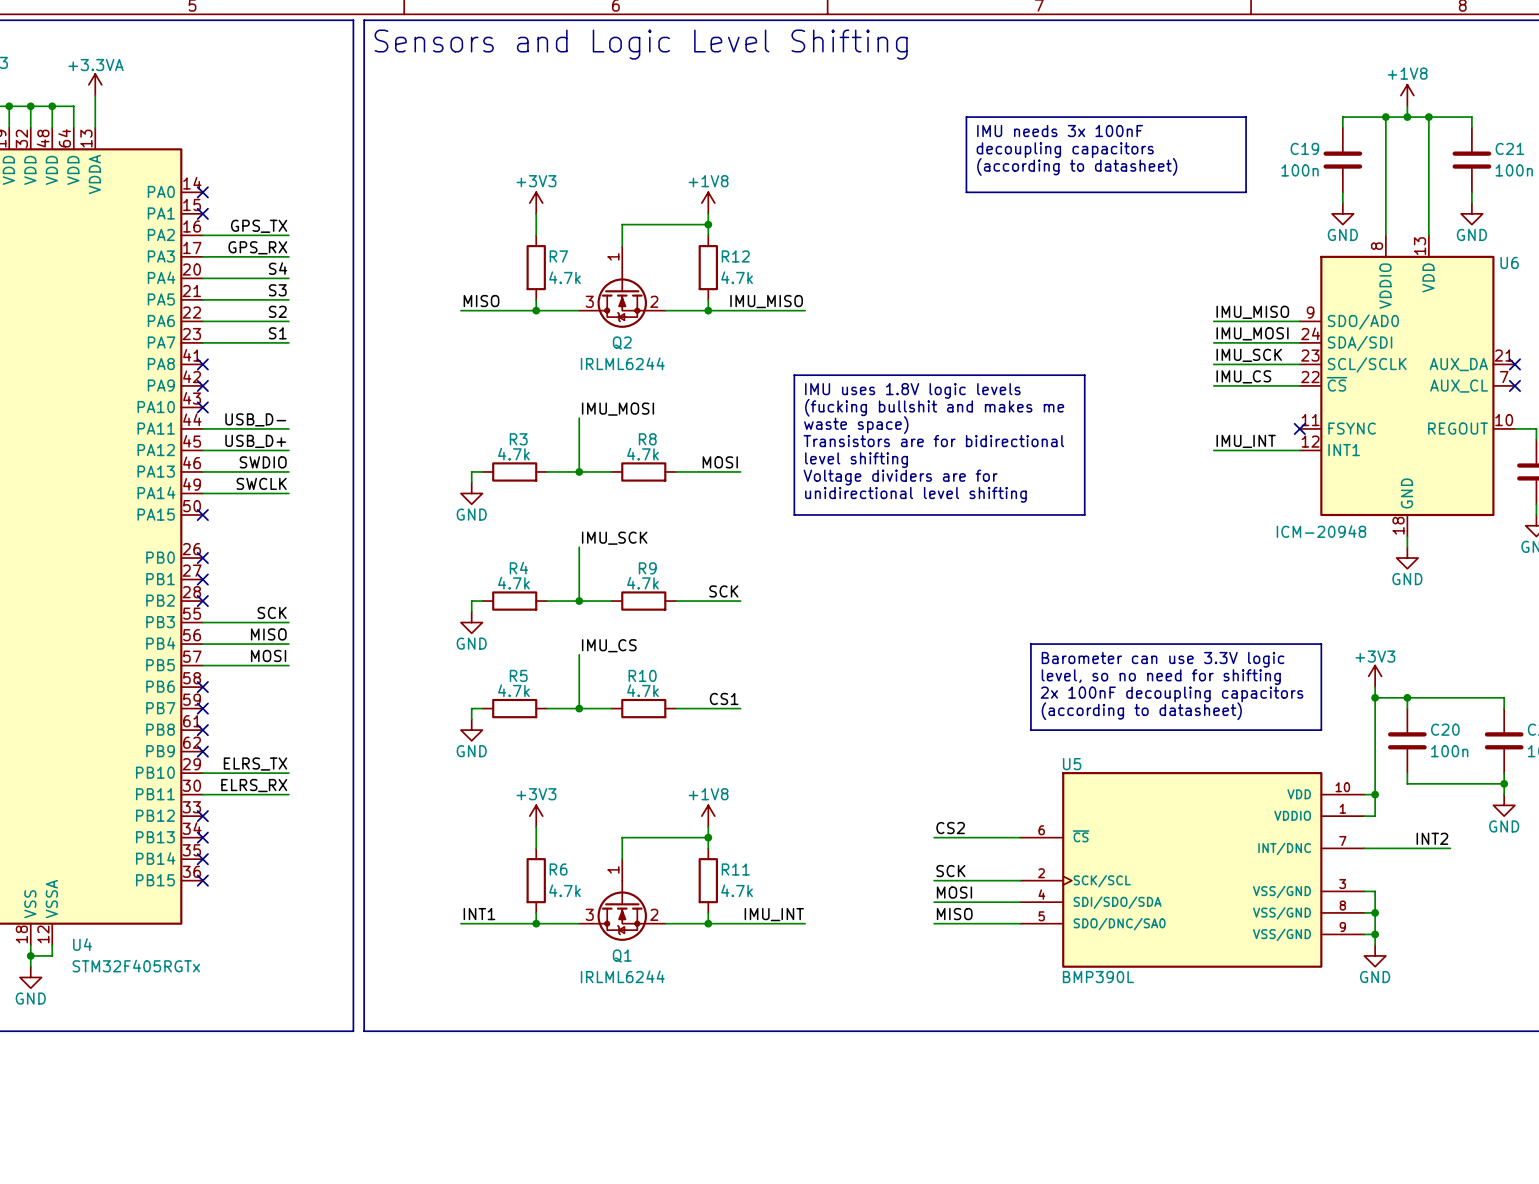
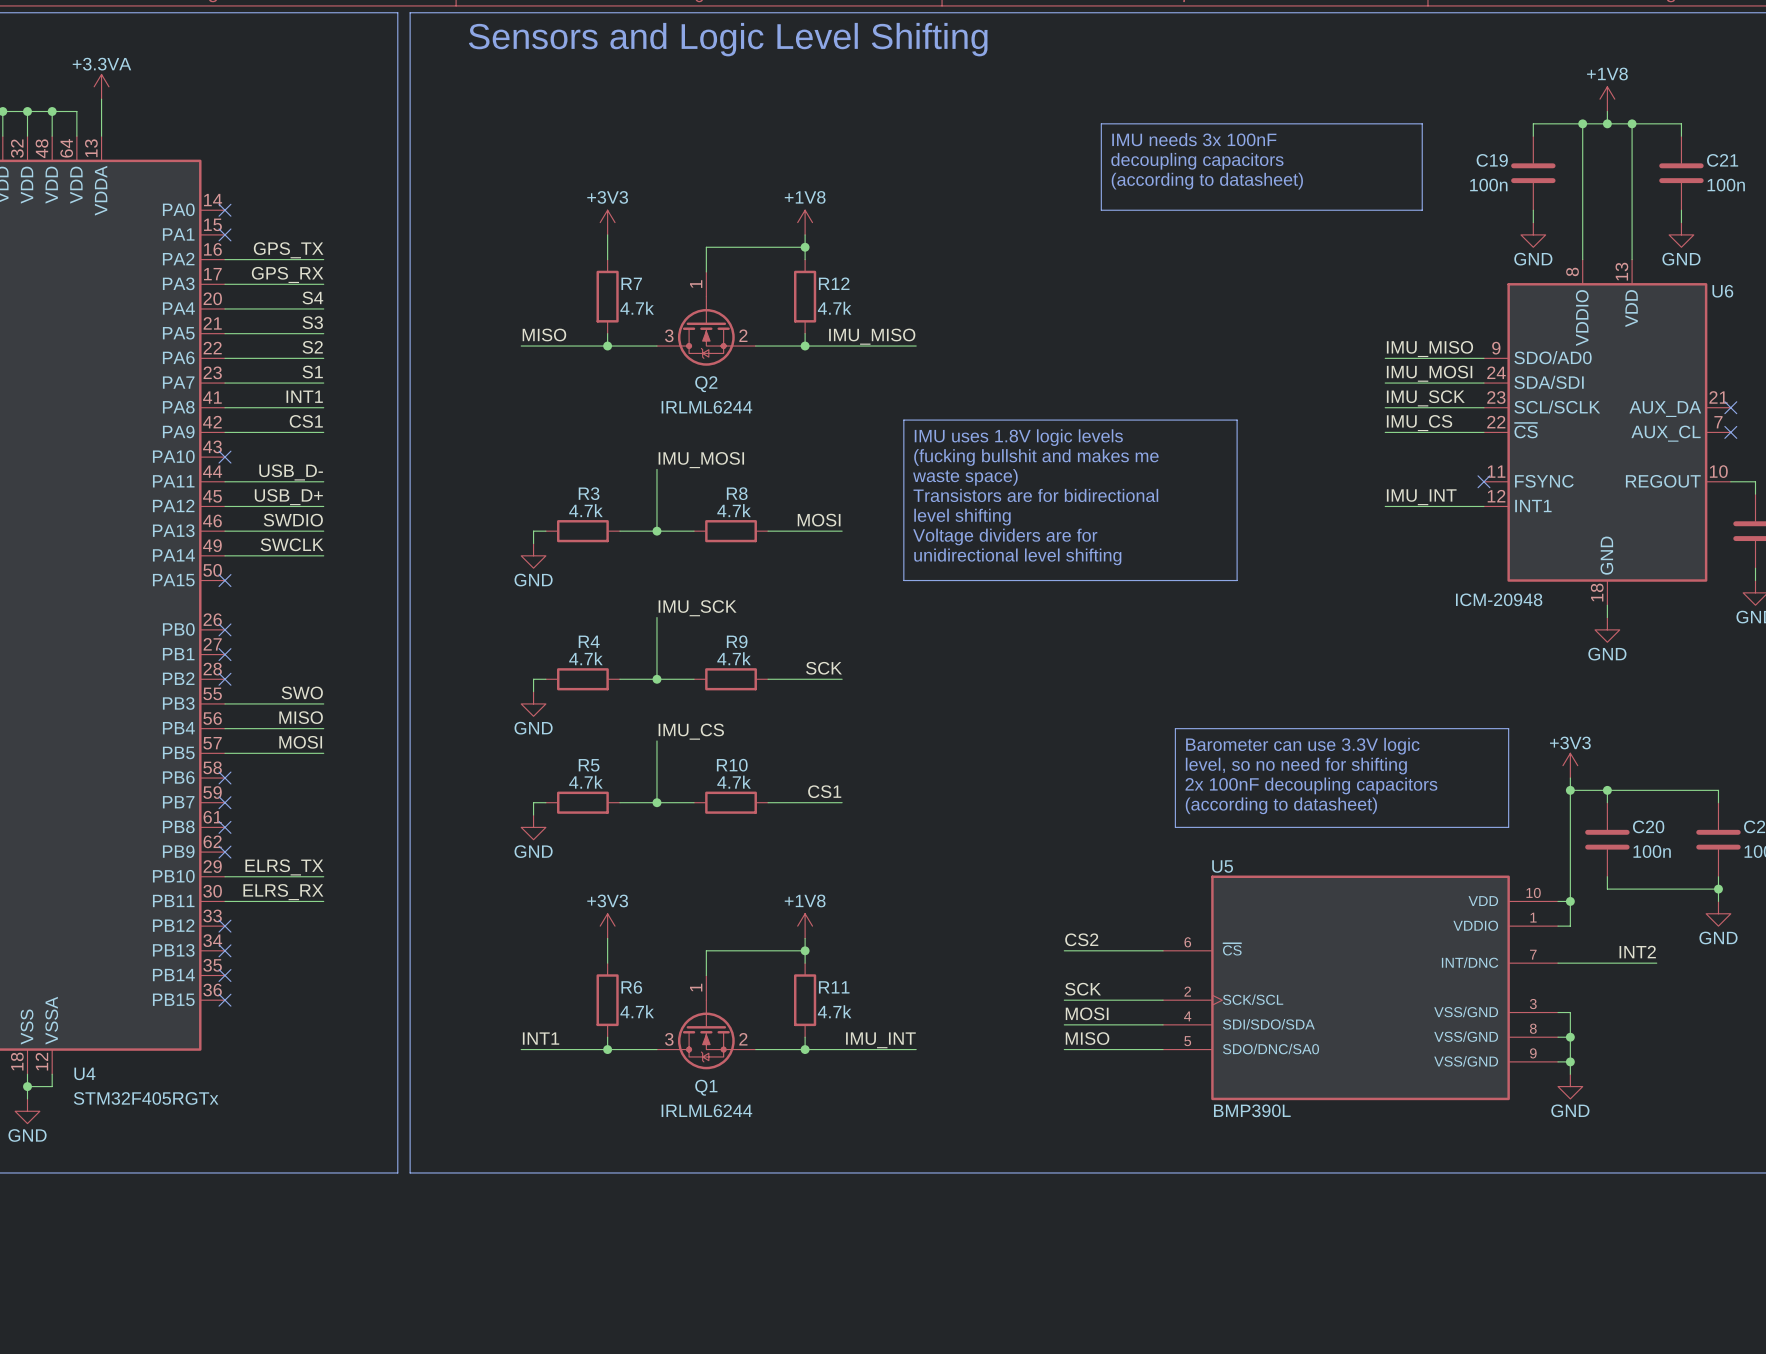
label: none -> INT1 (304, 396)
wire: none -> (224, 407) (323, 407)
no-connect mark: (202, 364) -> none
label: none -> CS1 (306, 421)
wire: none -> (224, 432) (323, 432)
no-connect mark: (202, 385) -> none
label: SCK (272, 612) -> SWO (302, 692)

